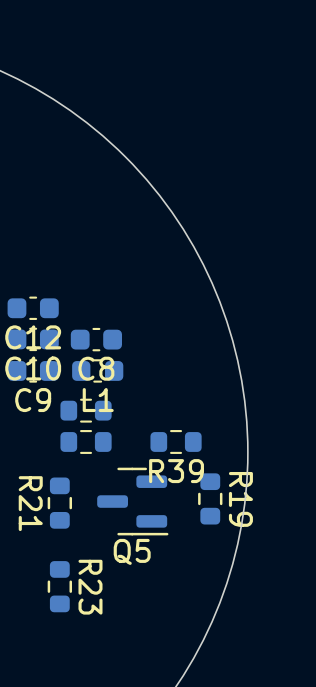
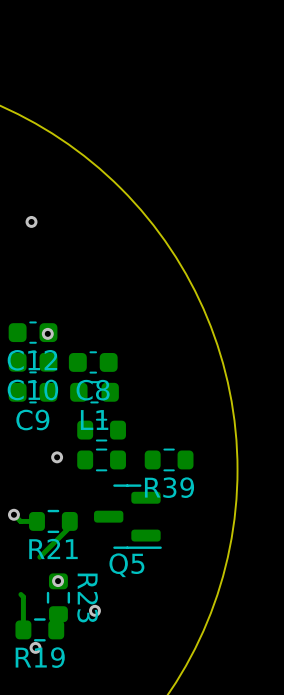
via: none -> (31, 221)
via: none -> (47, 333)
part: (86, 410) -> none
part: none -> (101, 430)
via: none -> (57, 457)
part: (86, 441) -> none
part: none -> (101, 459)
R19 rotation: 0° (210, 498) -> 90° clockwise (39, 629)
R19 position: (210, 498) -> (39, 629)
track: none -> (13, 514) (20, 521) (36, 521)
via: none -> (13, 514)
R21 name position: R21 (30, 503) -> R21 (53, 548)
R21 rotation: 0° (59, 503) -> 90° clockwise (53, 521)
track: none -> (69, 521) (69, 527) (39, 557)
via: none -> (58, 581)
track: none -> (20, 594) (23, 596) (23, 629)
via: none -> (94, 610)
via: none -> (35, 647)

